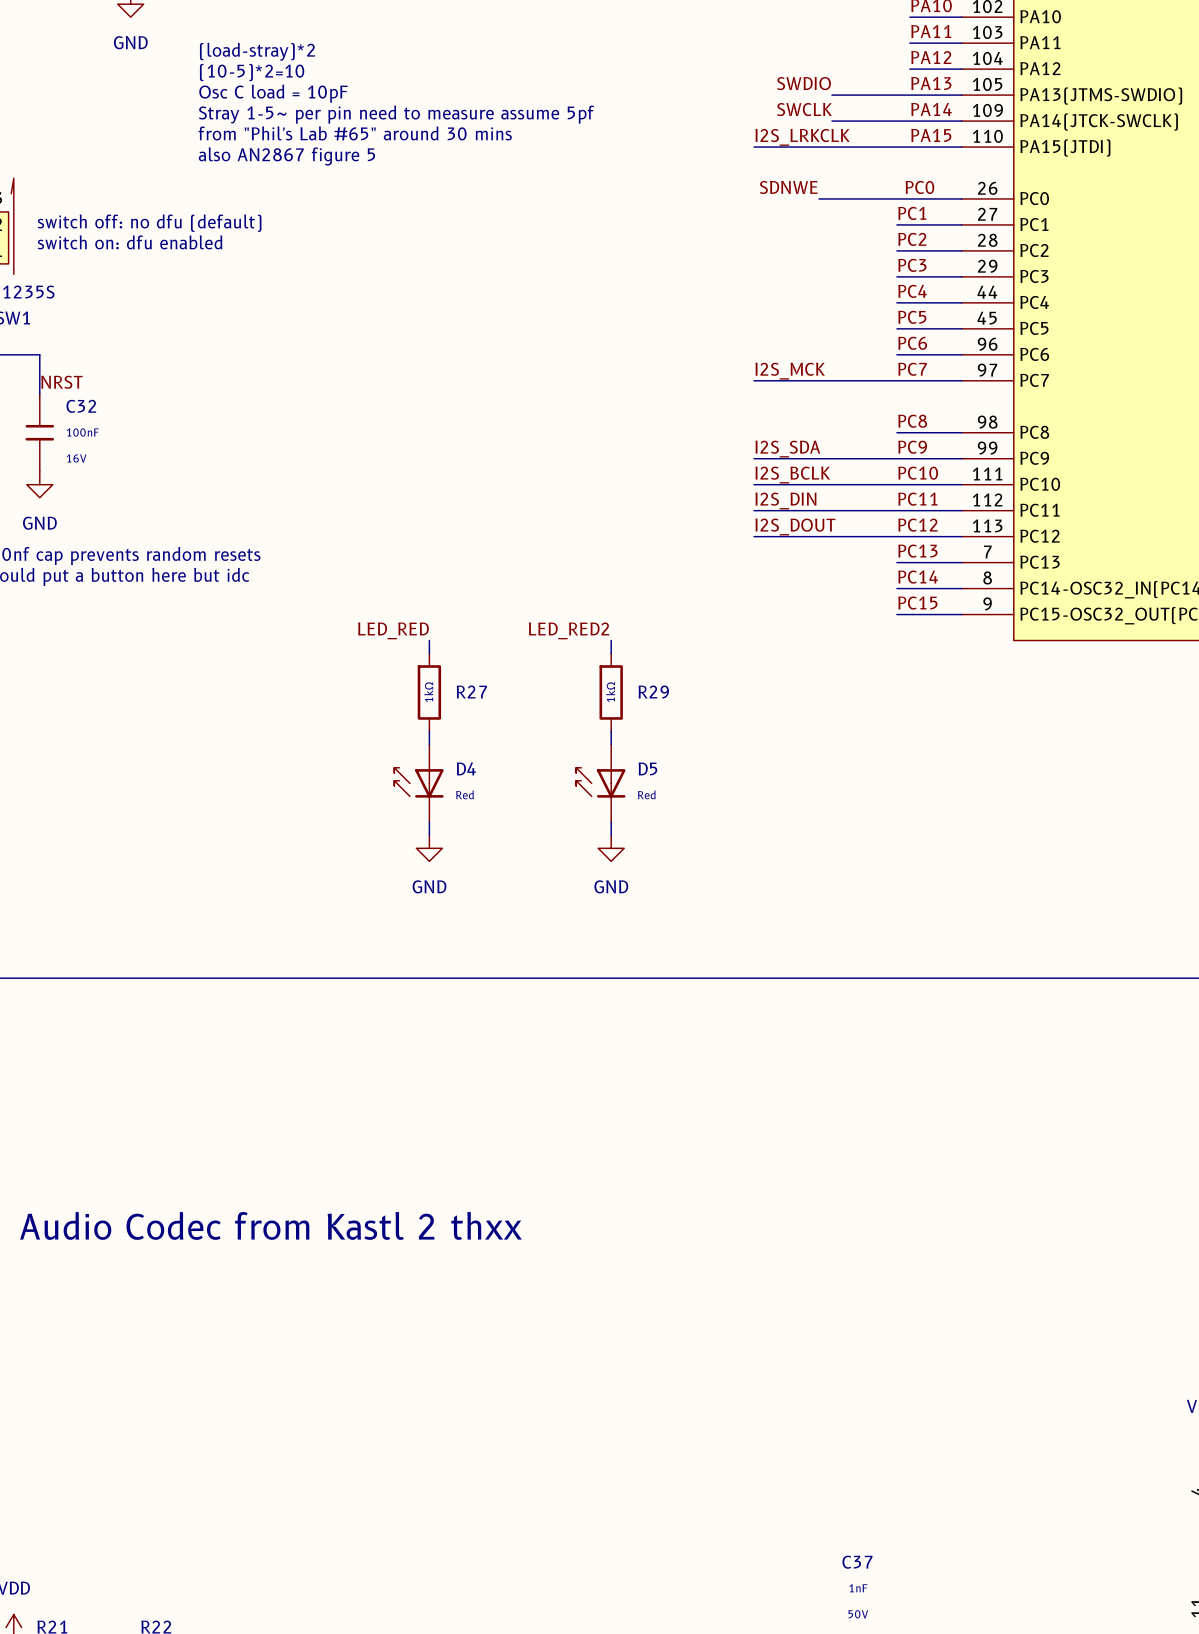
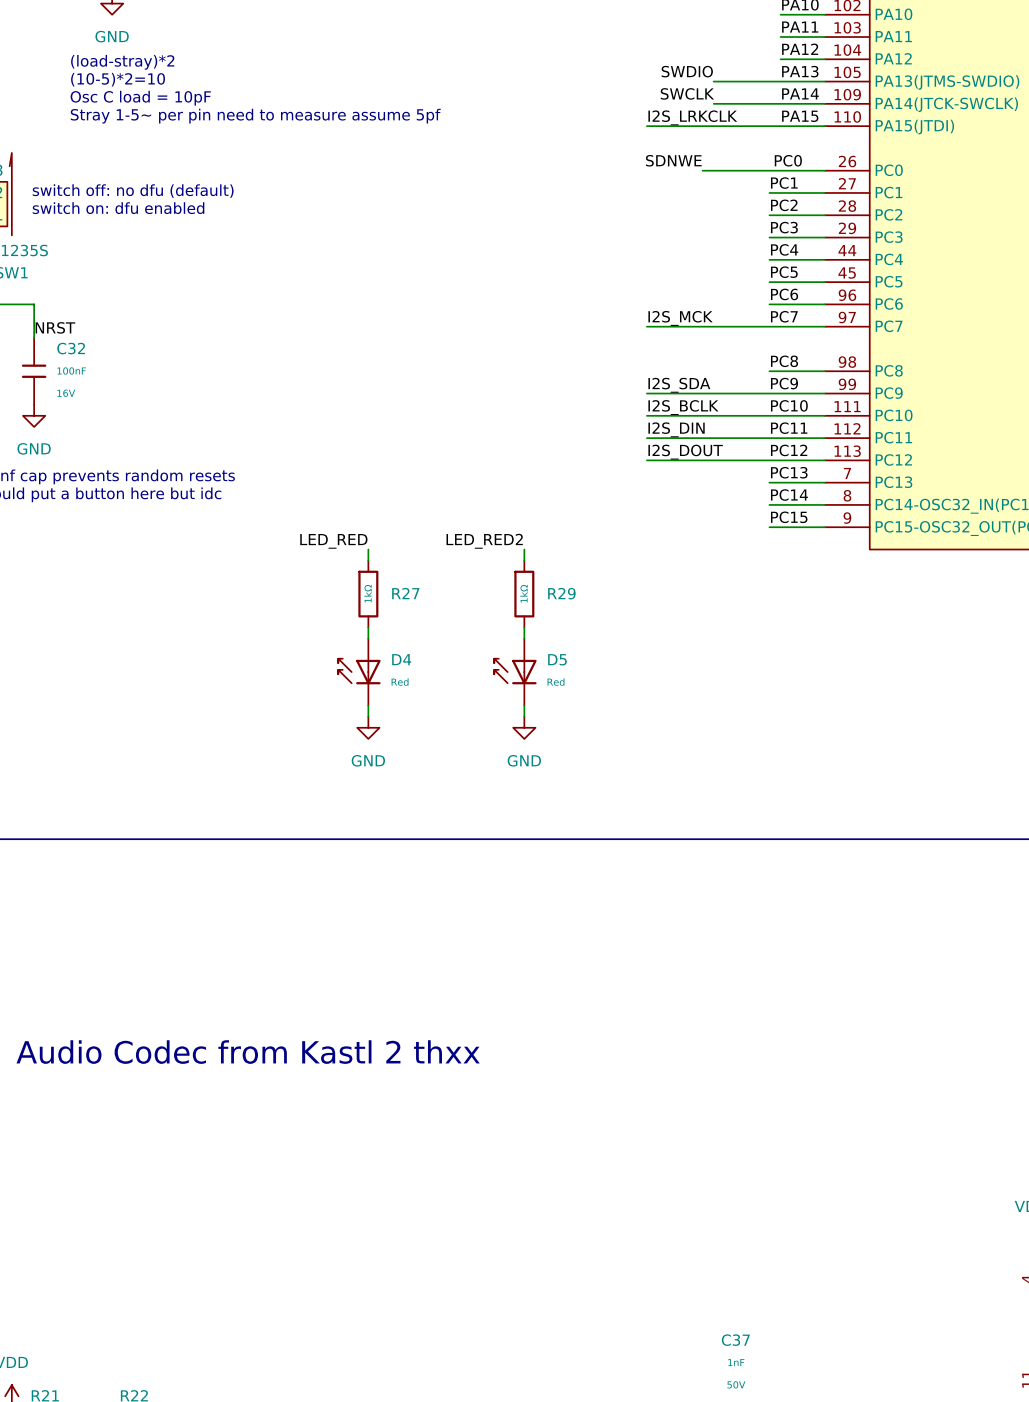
text position: (load-stray)*2 (257, 51) -> (load-stray)*2 (122, 62)
text position: (10-5)*2=10 (252, 72) -> (10-5)*2=10 (118, 79)
text position: Osc C load = 10pF (273, 93) -> Osc C load = 10pF (140, 98)
text position: Stray 1-5~ per pin need to measure assume 5pf (396, 114) -> Stray 1-5~ per pin need to measure assume 5pf (255, 116)
text: from "Phil's Lab #65" around 30 mins (355, 133) -> none
text: also AN2867 figure 5 (286, 156) -> none

